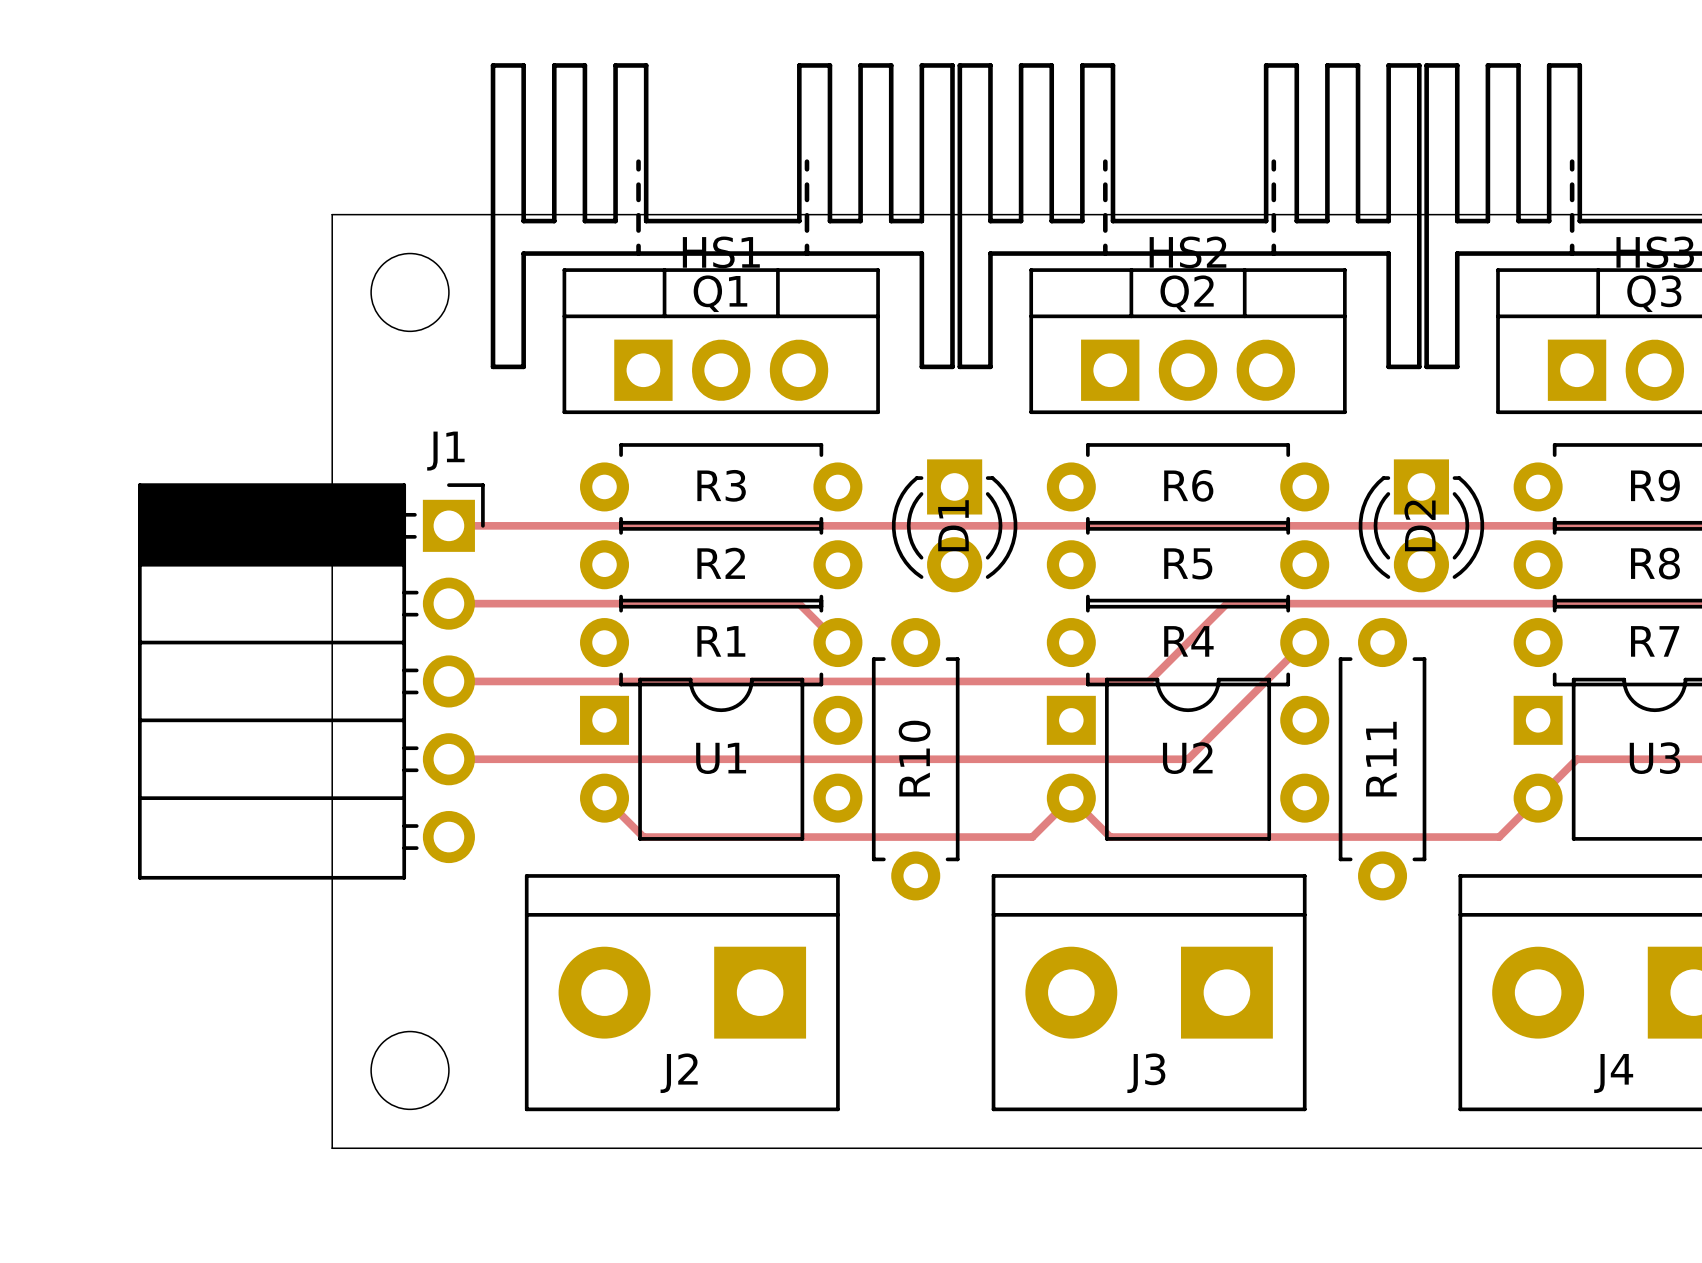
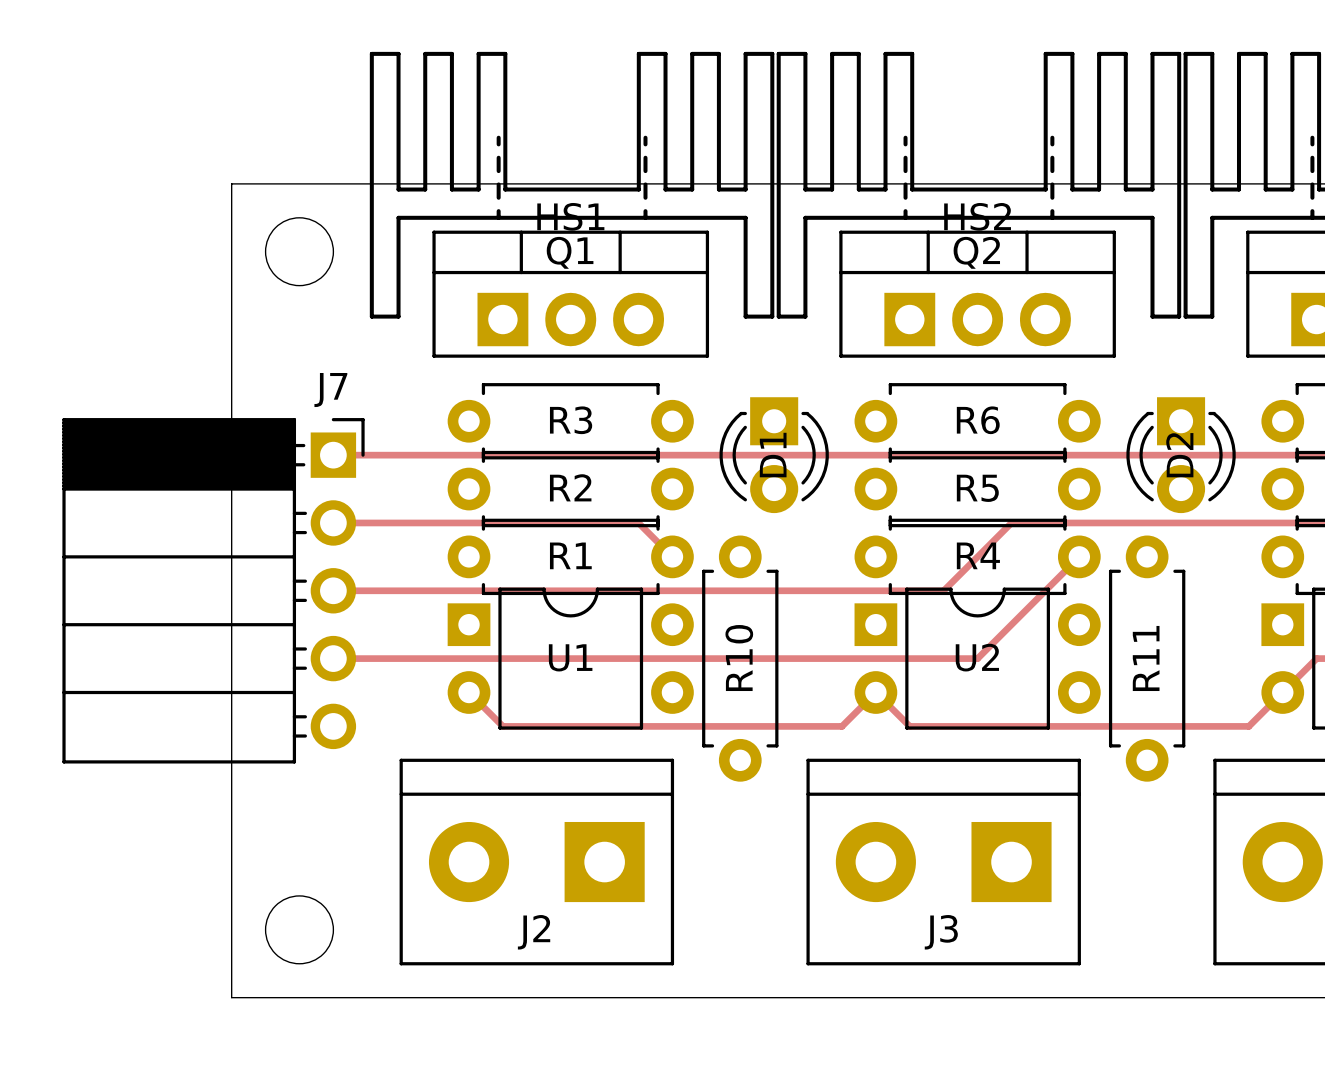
J1 name: J1 (445, 451) -> J7 (330, 390)

